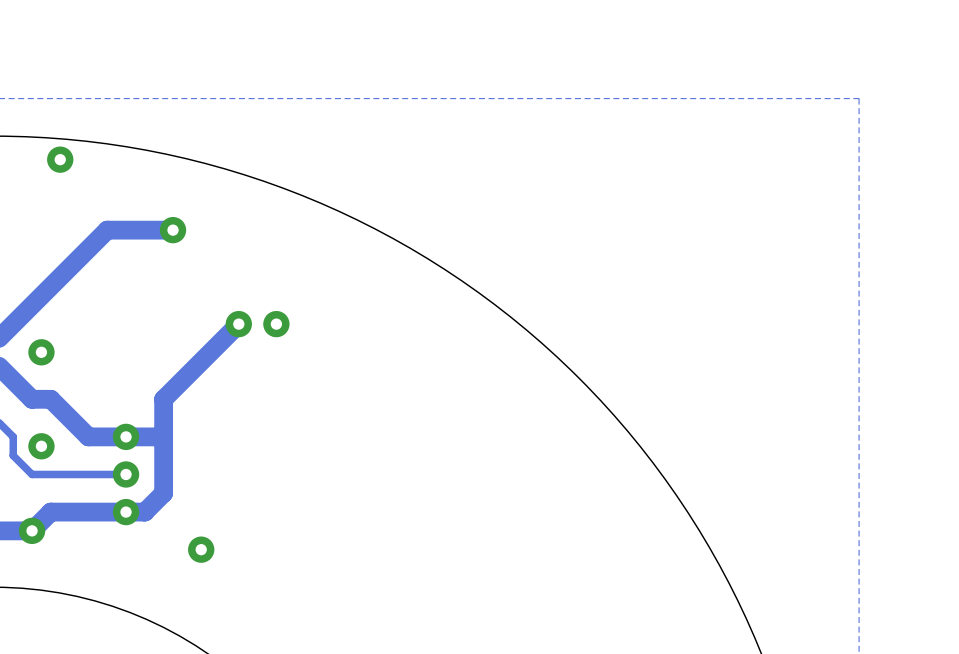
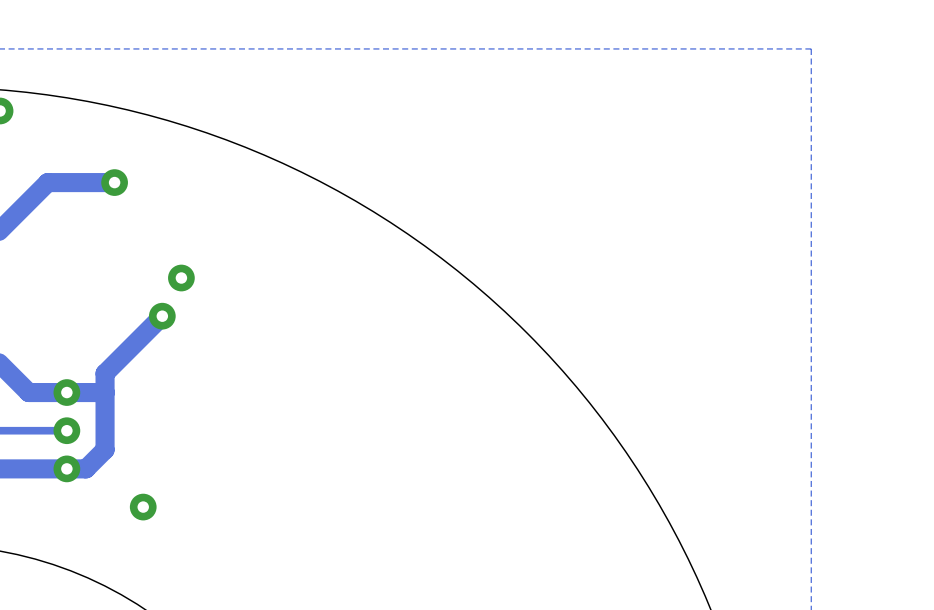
track: (238, 324) (163, 399) (163, 418) -> (162, 316) (105, 373)
via position: (276, 324) -> (162, 316)

